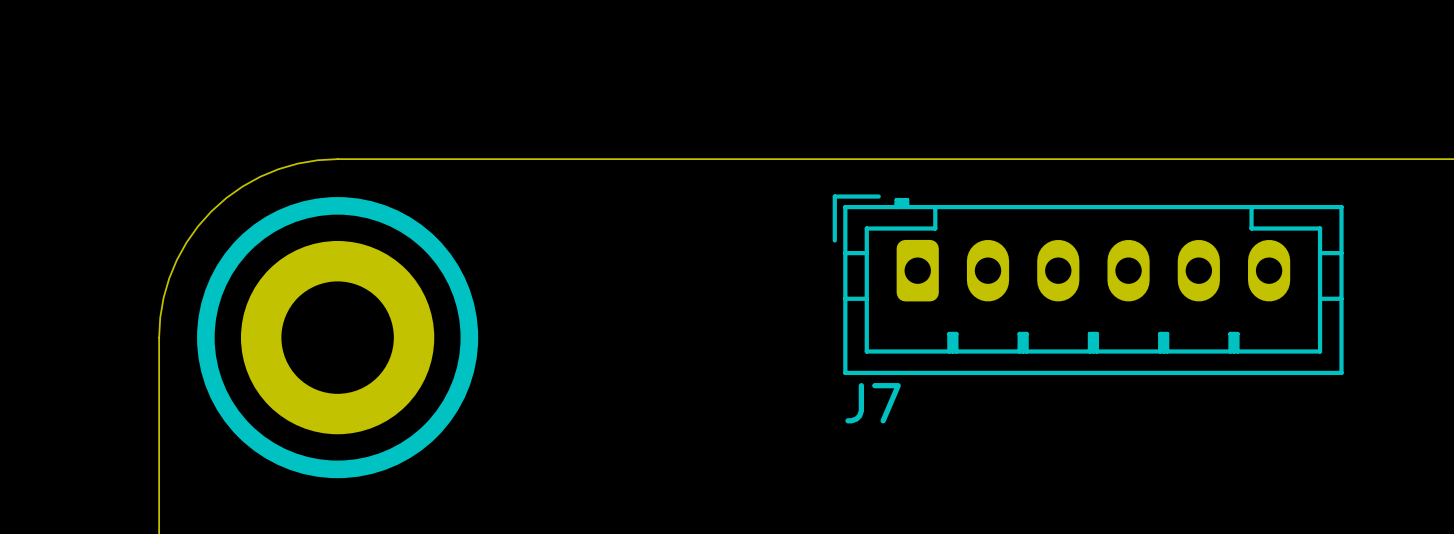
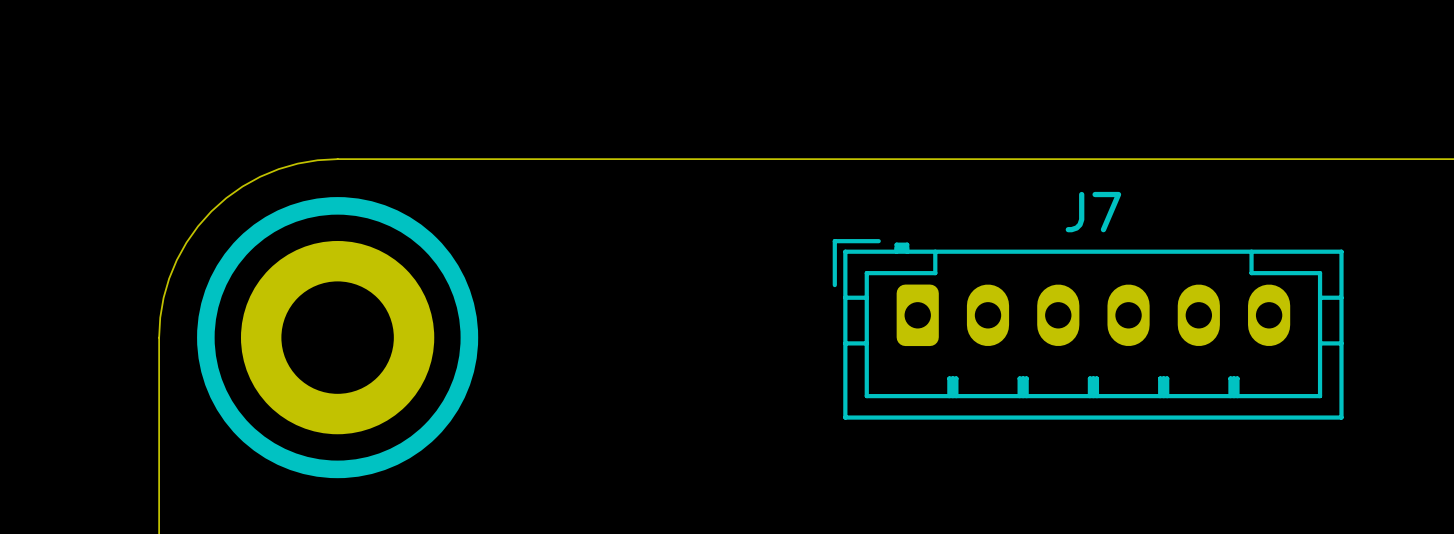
J7 position: (1088, 284) -> (1088, 329)
J7 name position: J7 (873, 403) -> J7 (1093, 212)

